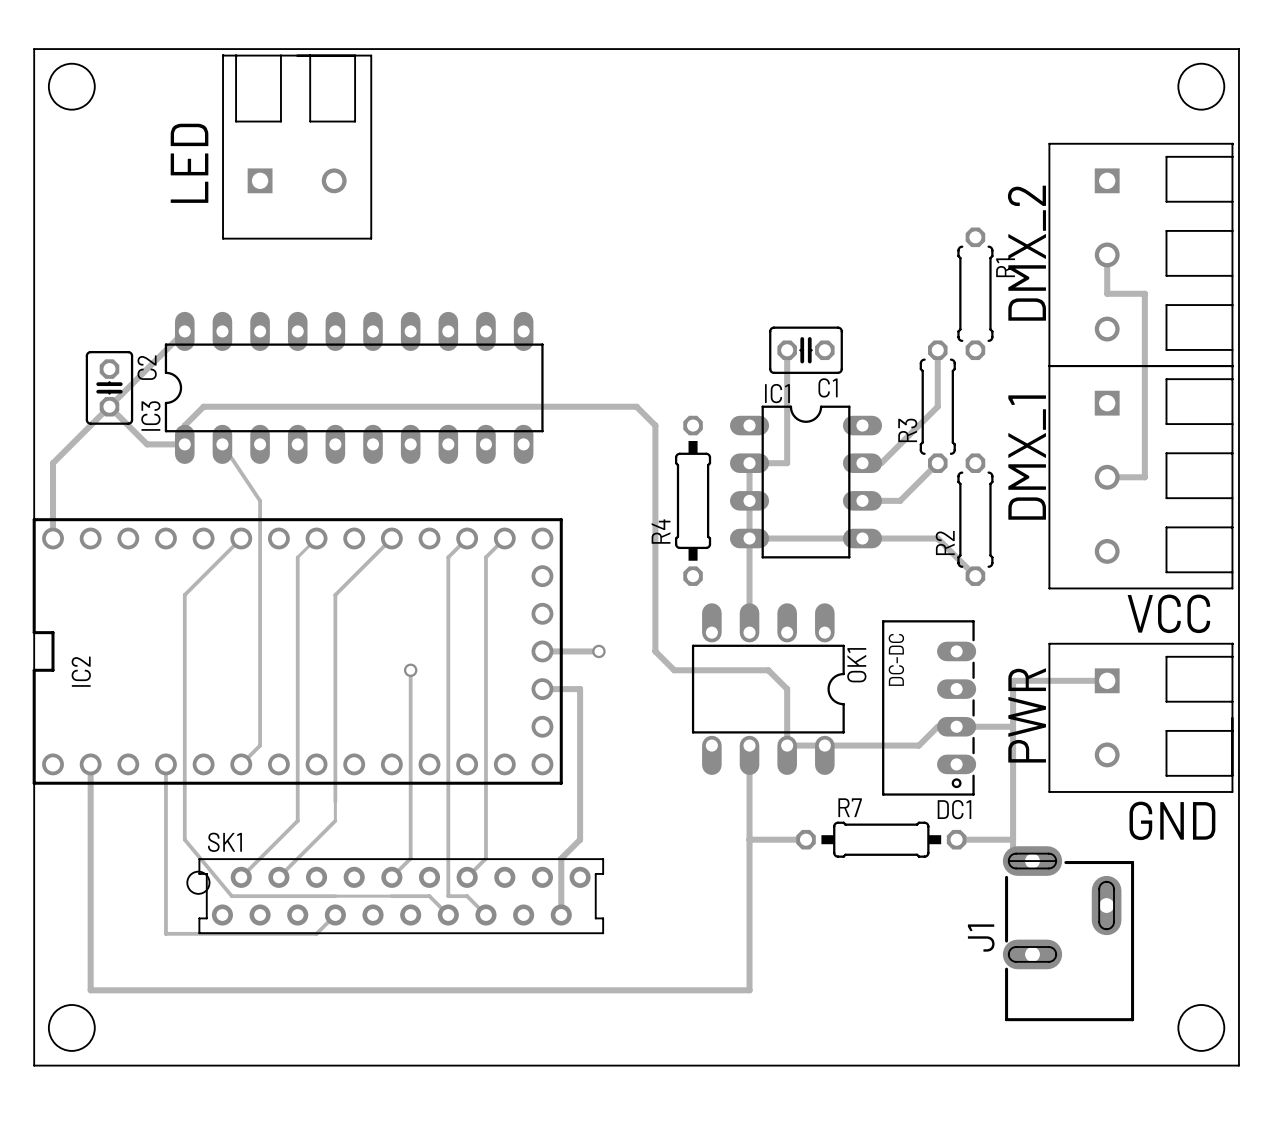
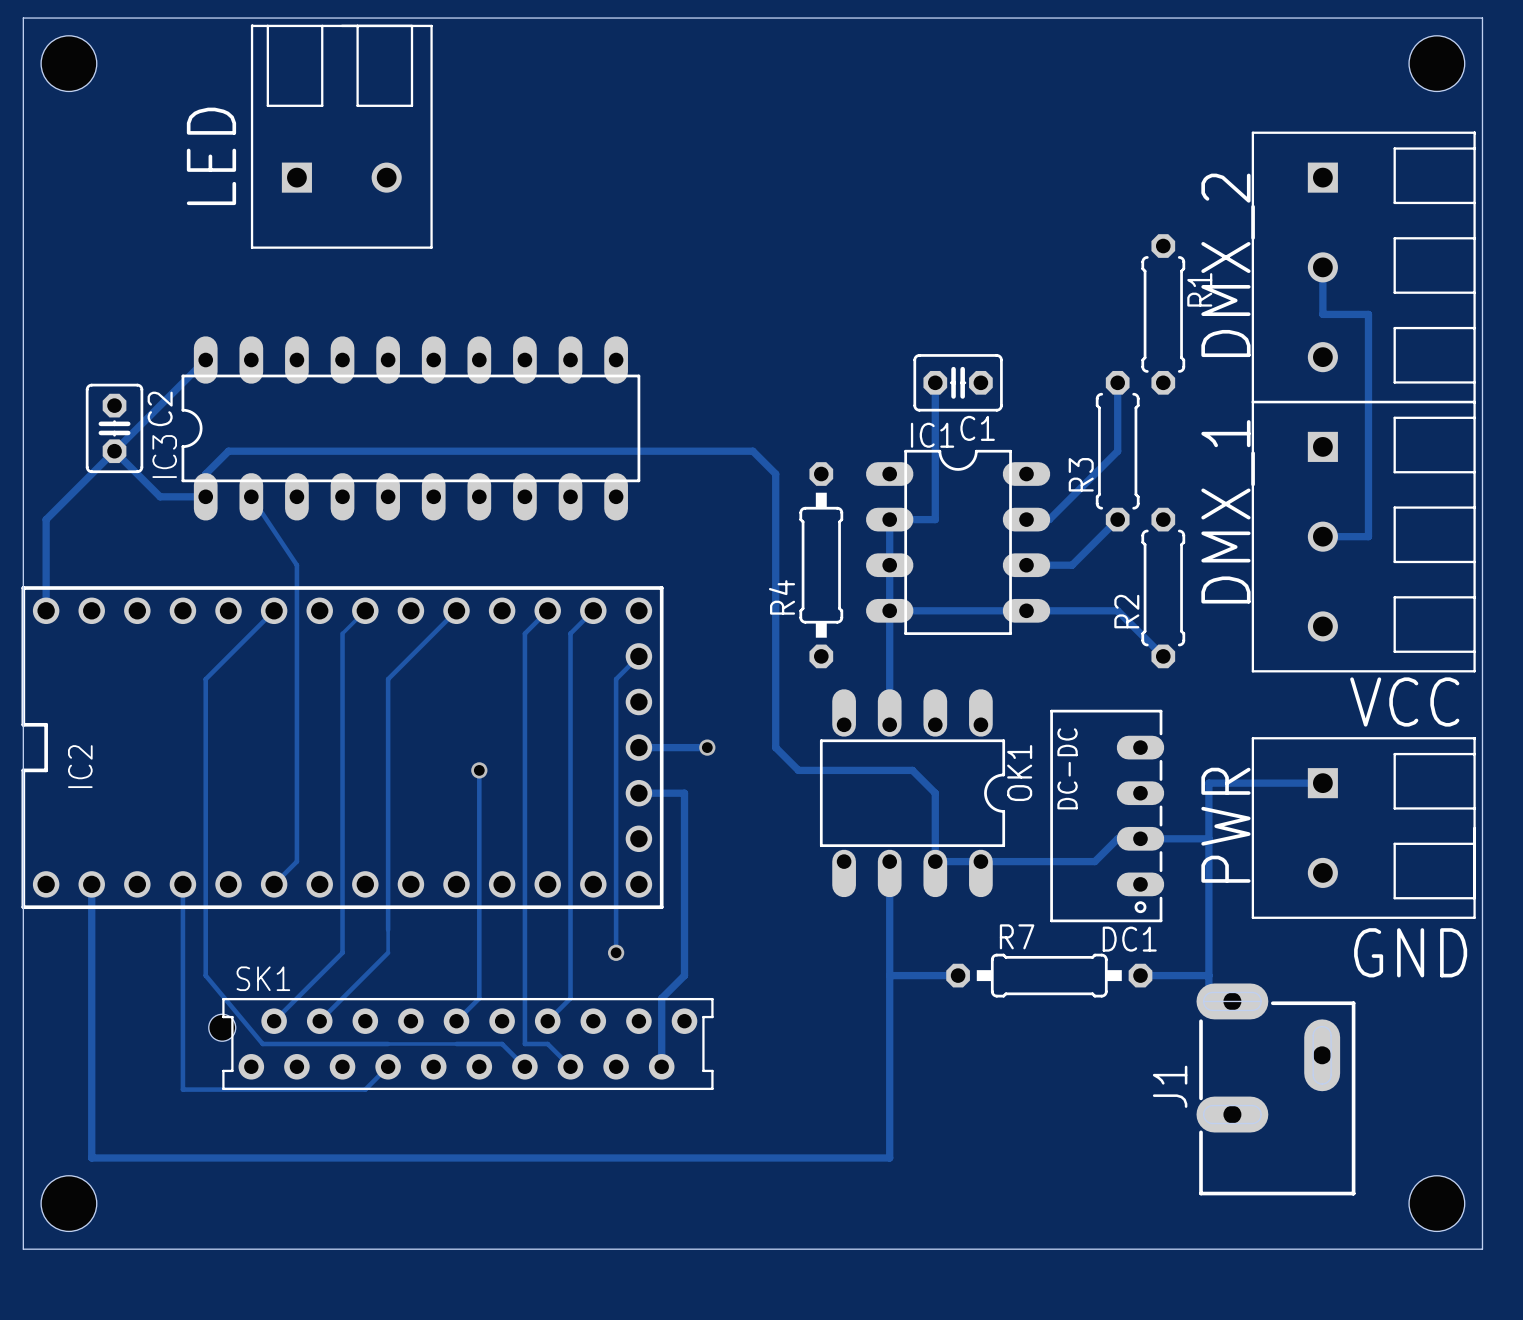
track: none -> (638, 656) (616, 679) (616, 952)
via: none -> (616, 952)

